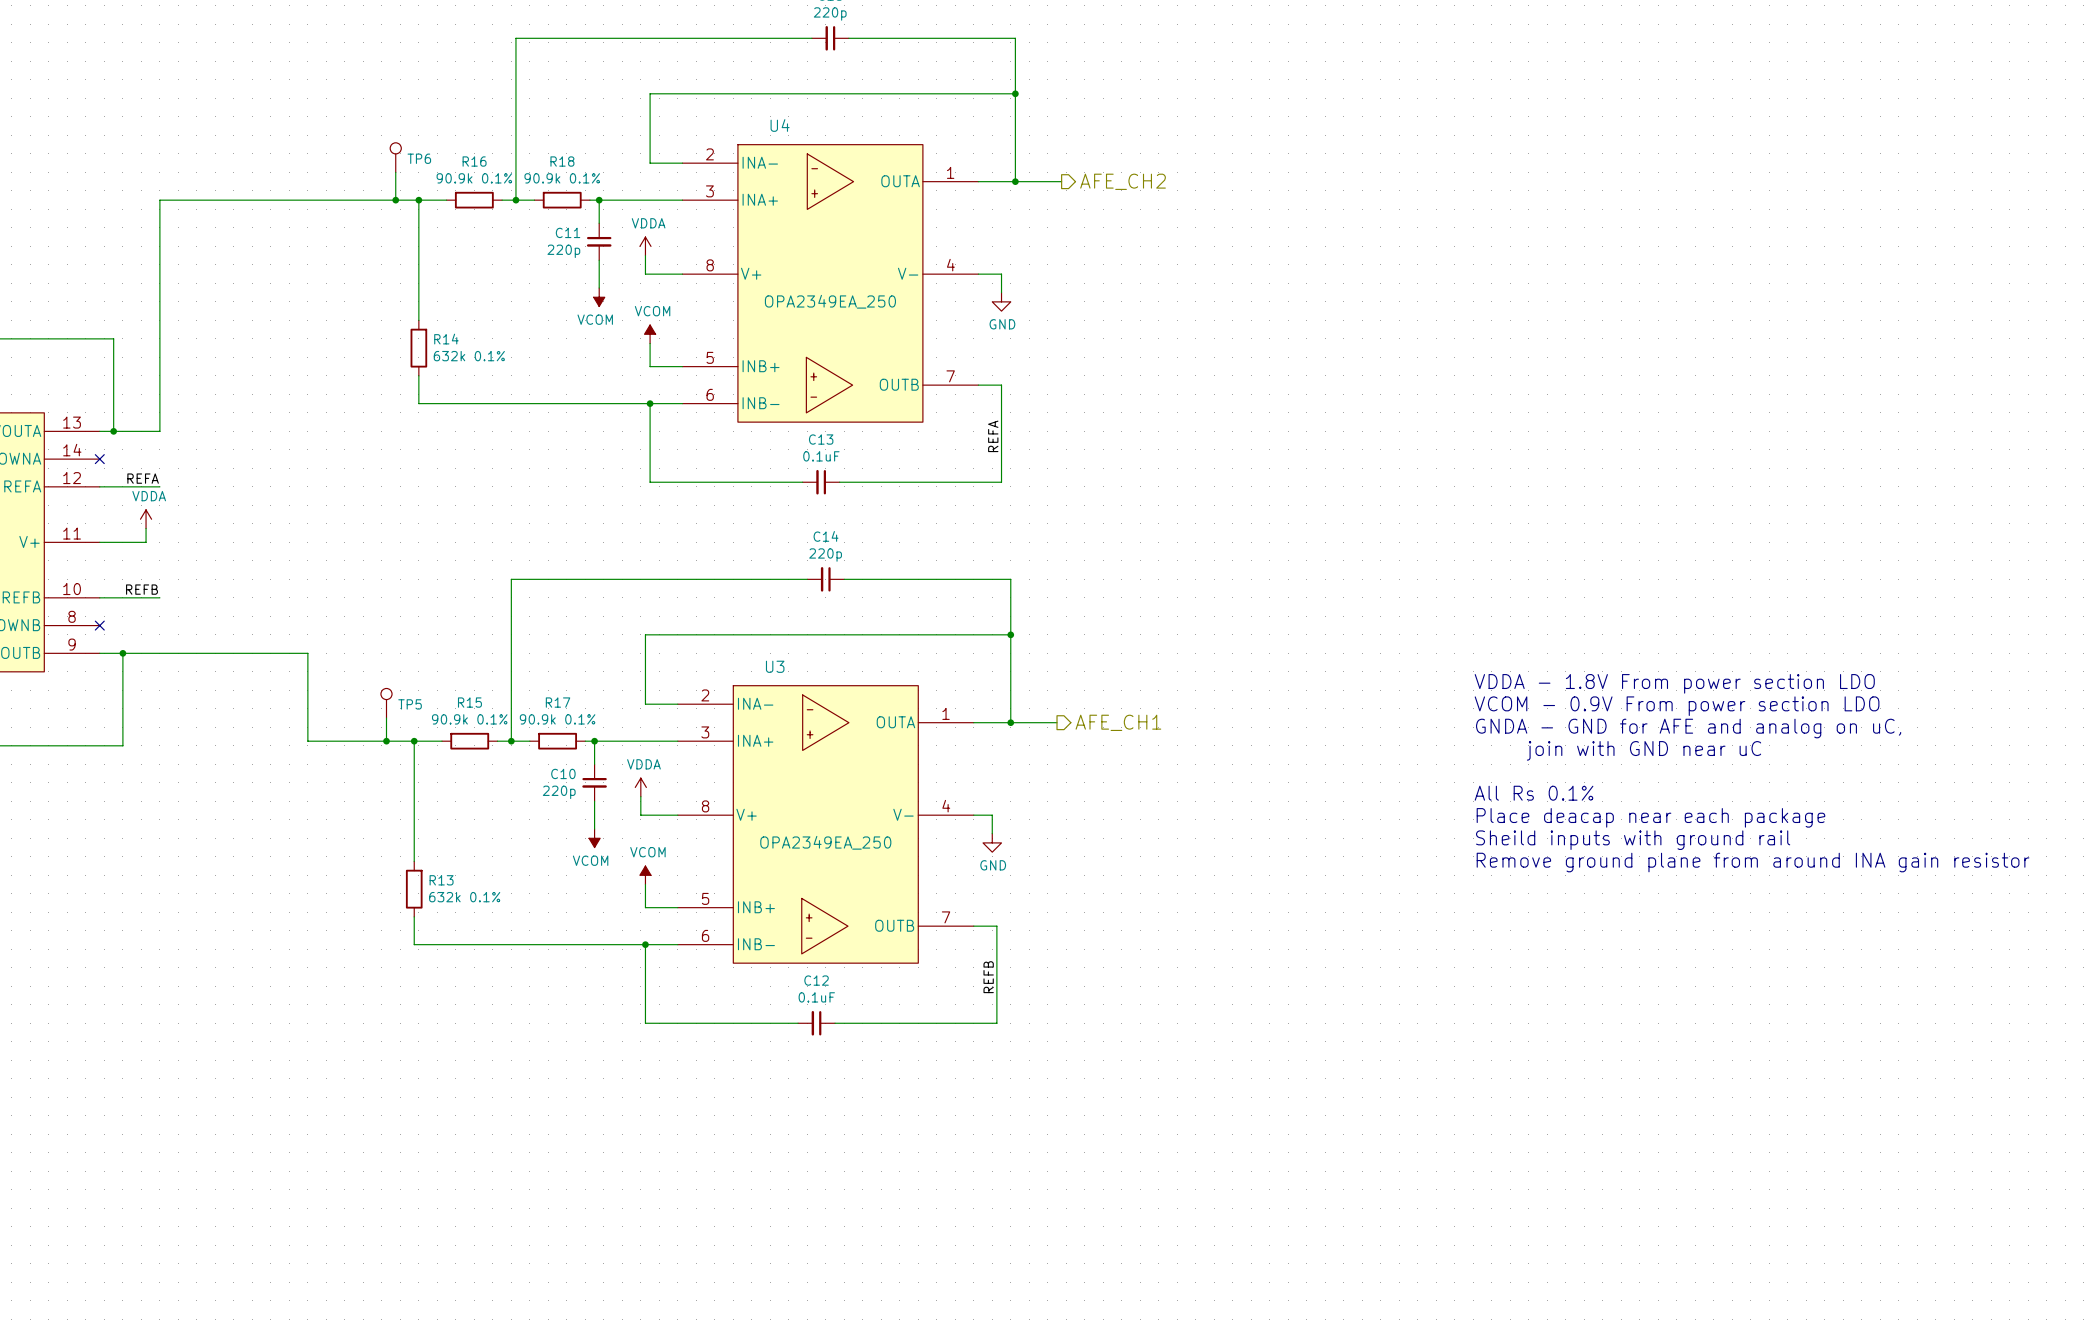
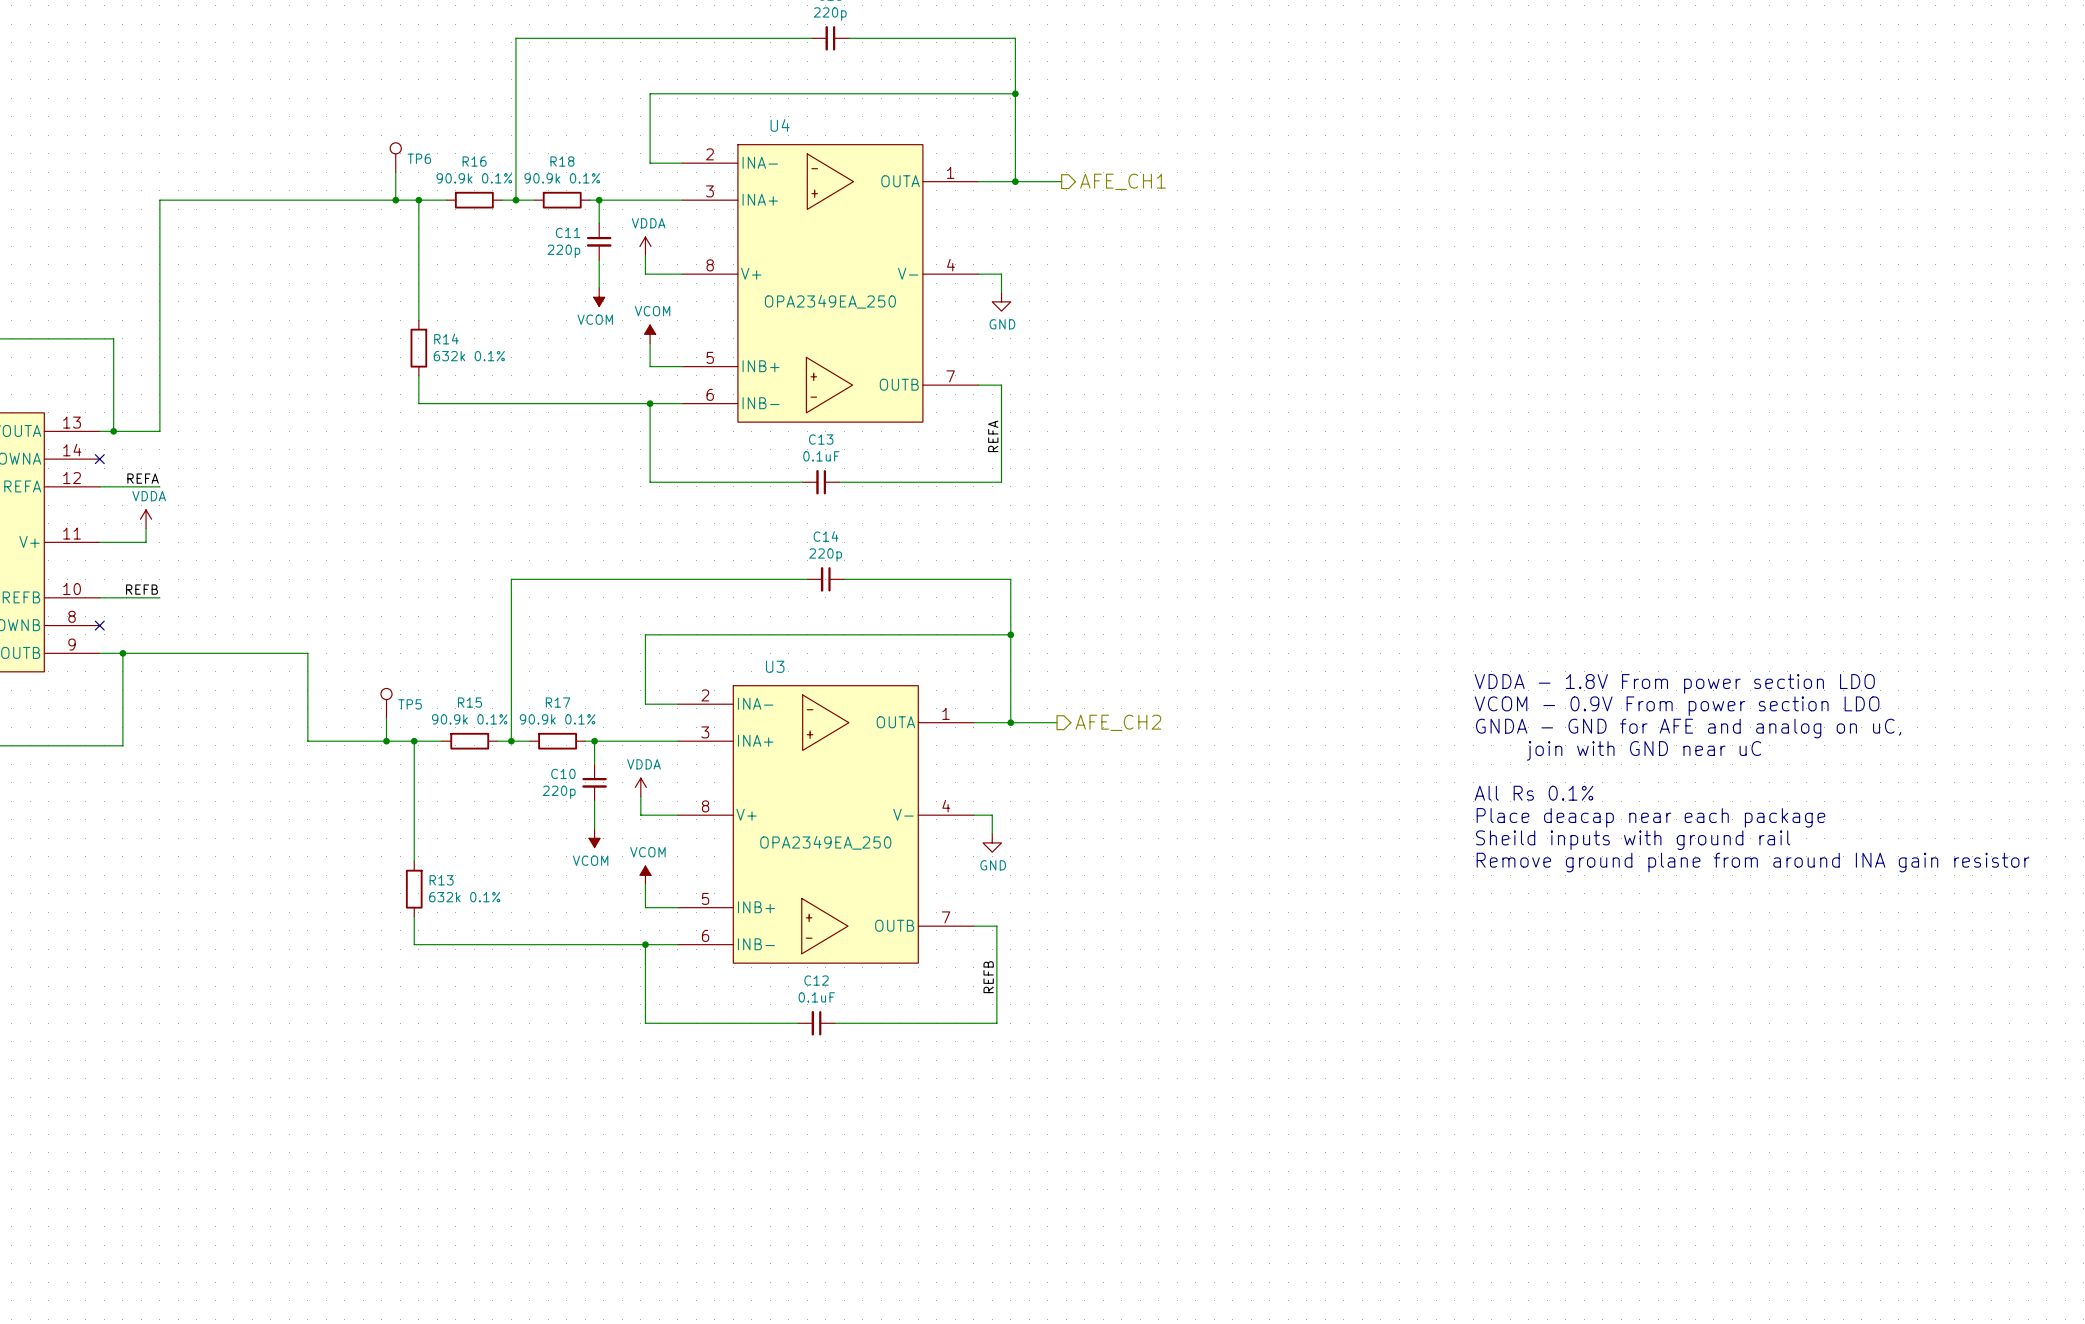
hierarchical label: AFE_CH2 (1123, 181) -> AFE_CH1 (1123, 181)
hierarchical label: AFE_CH1 (1118, 722) -> AFE_CH2 (1118, 722)

